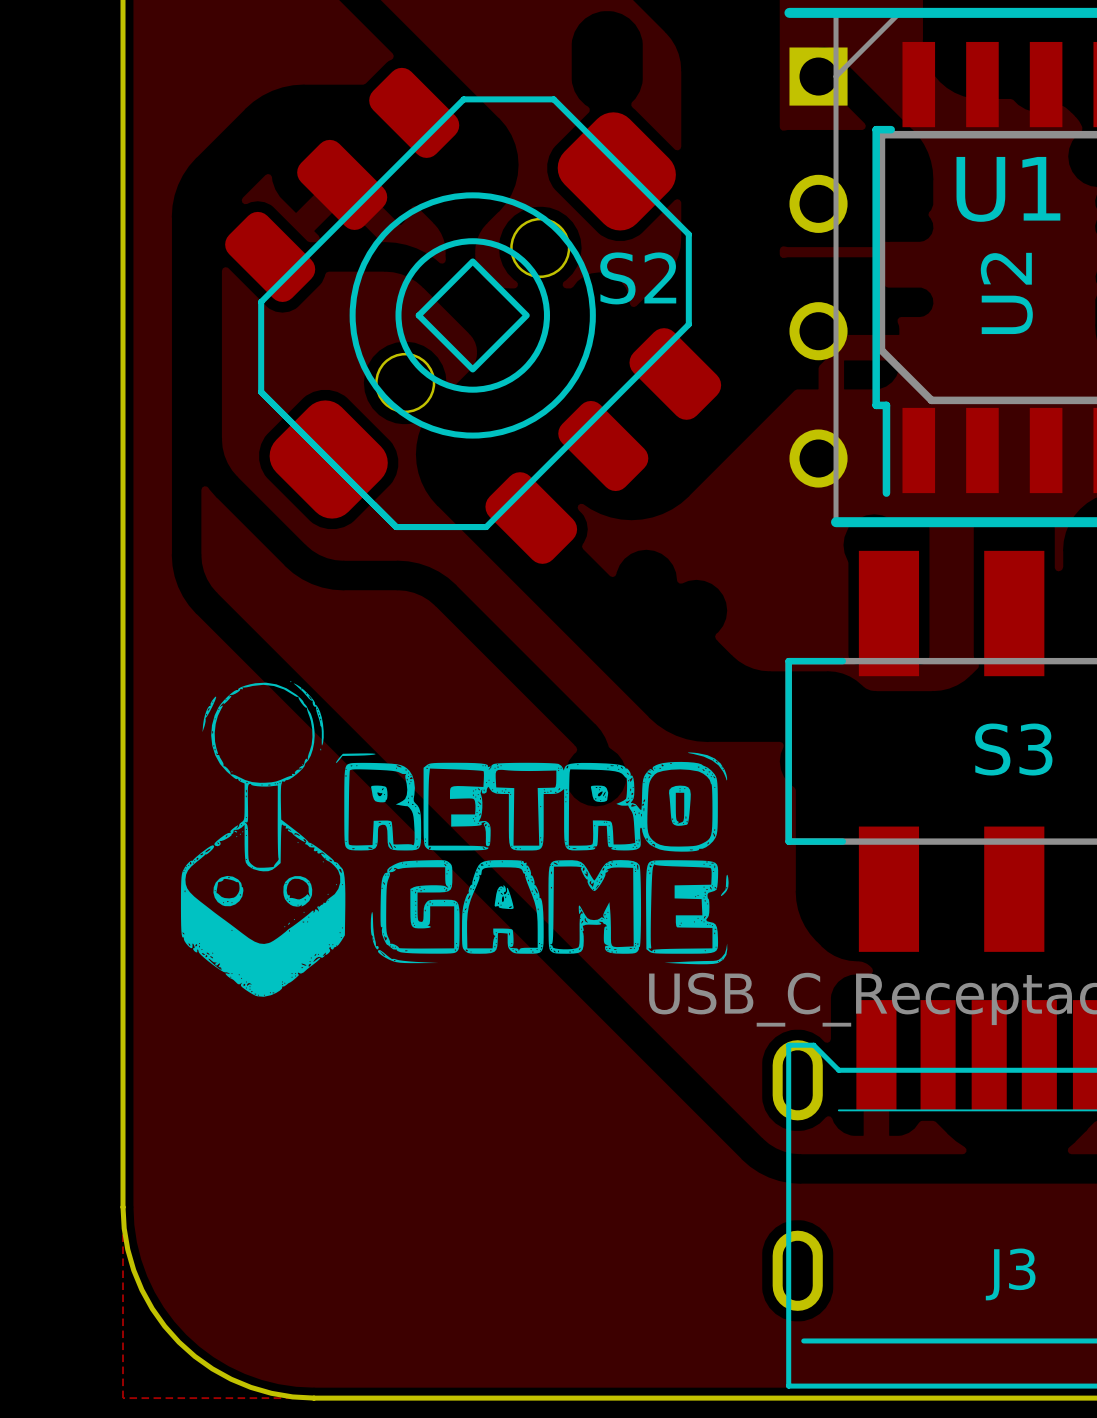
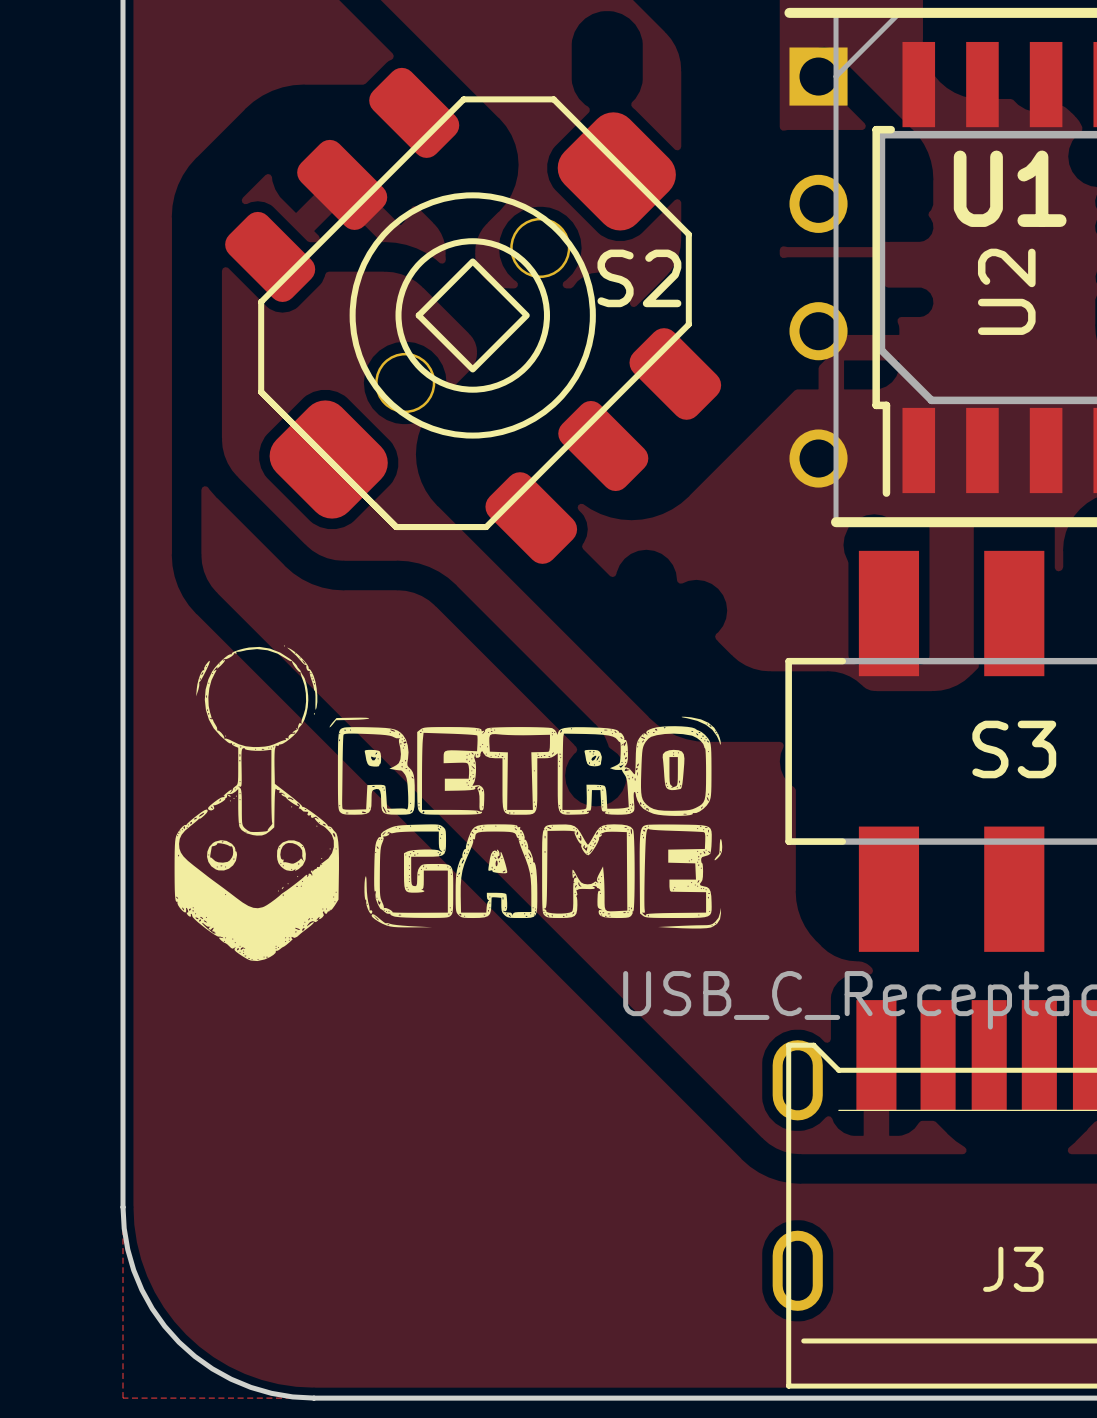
drawing position: (454, 838) -> (448, 803)

